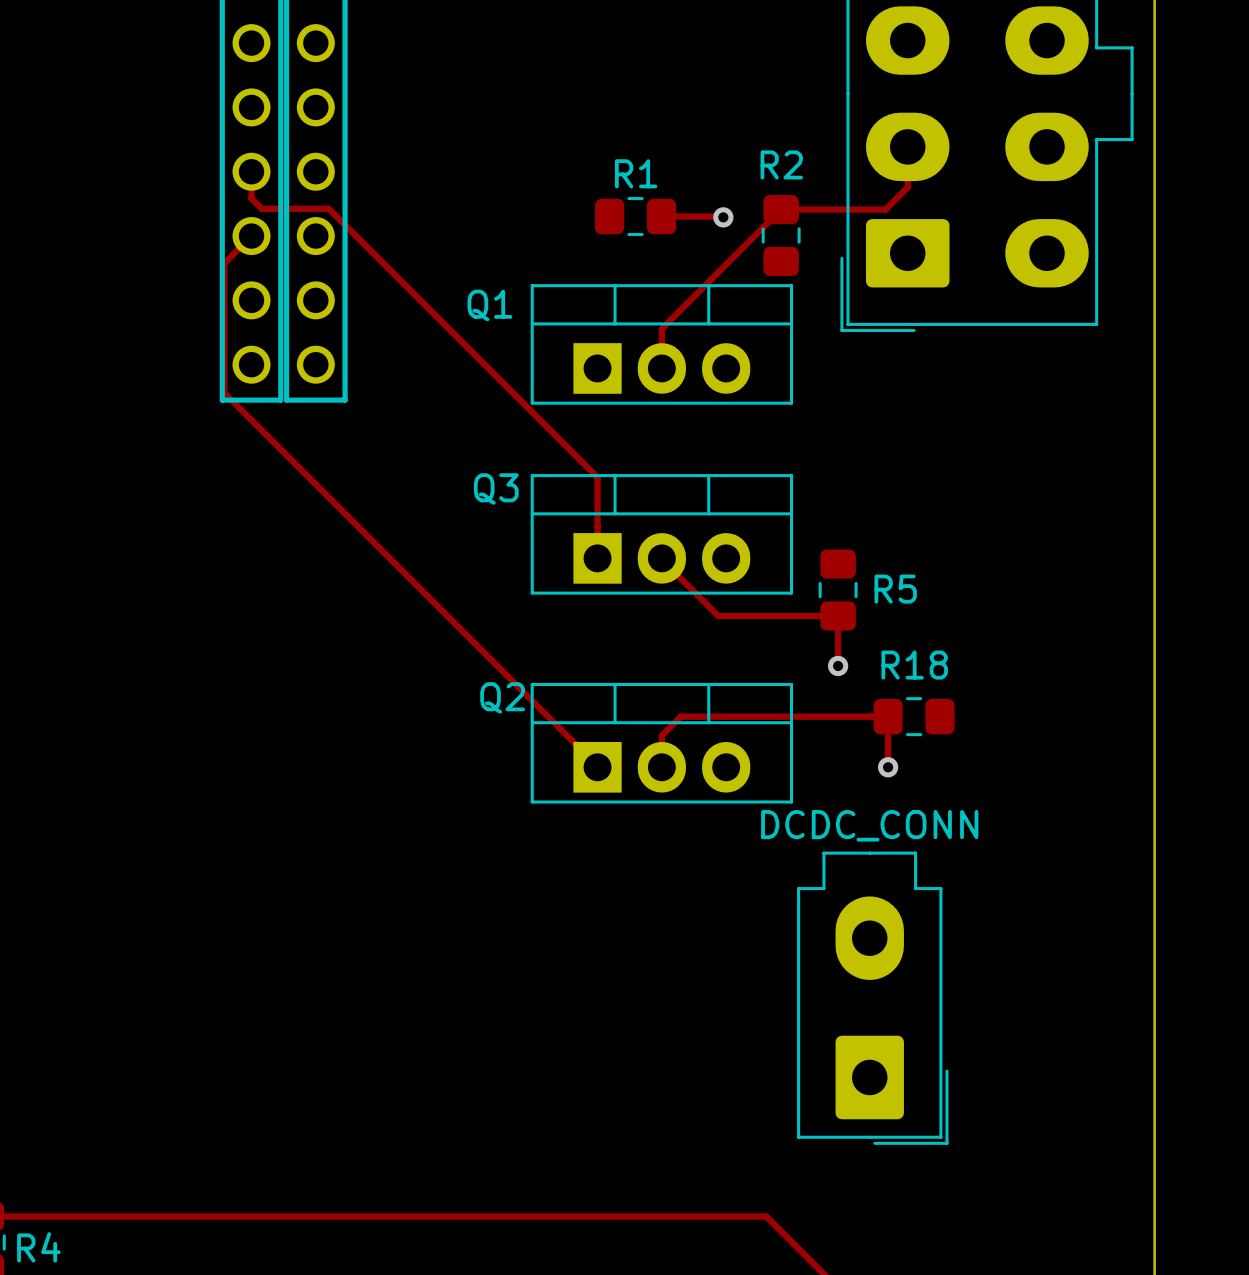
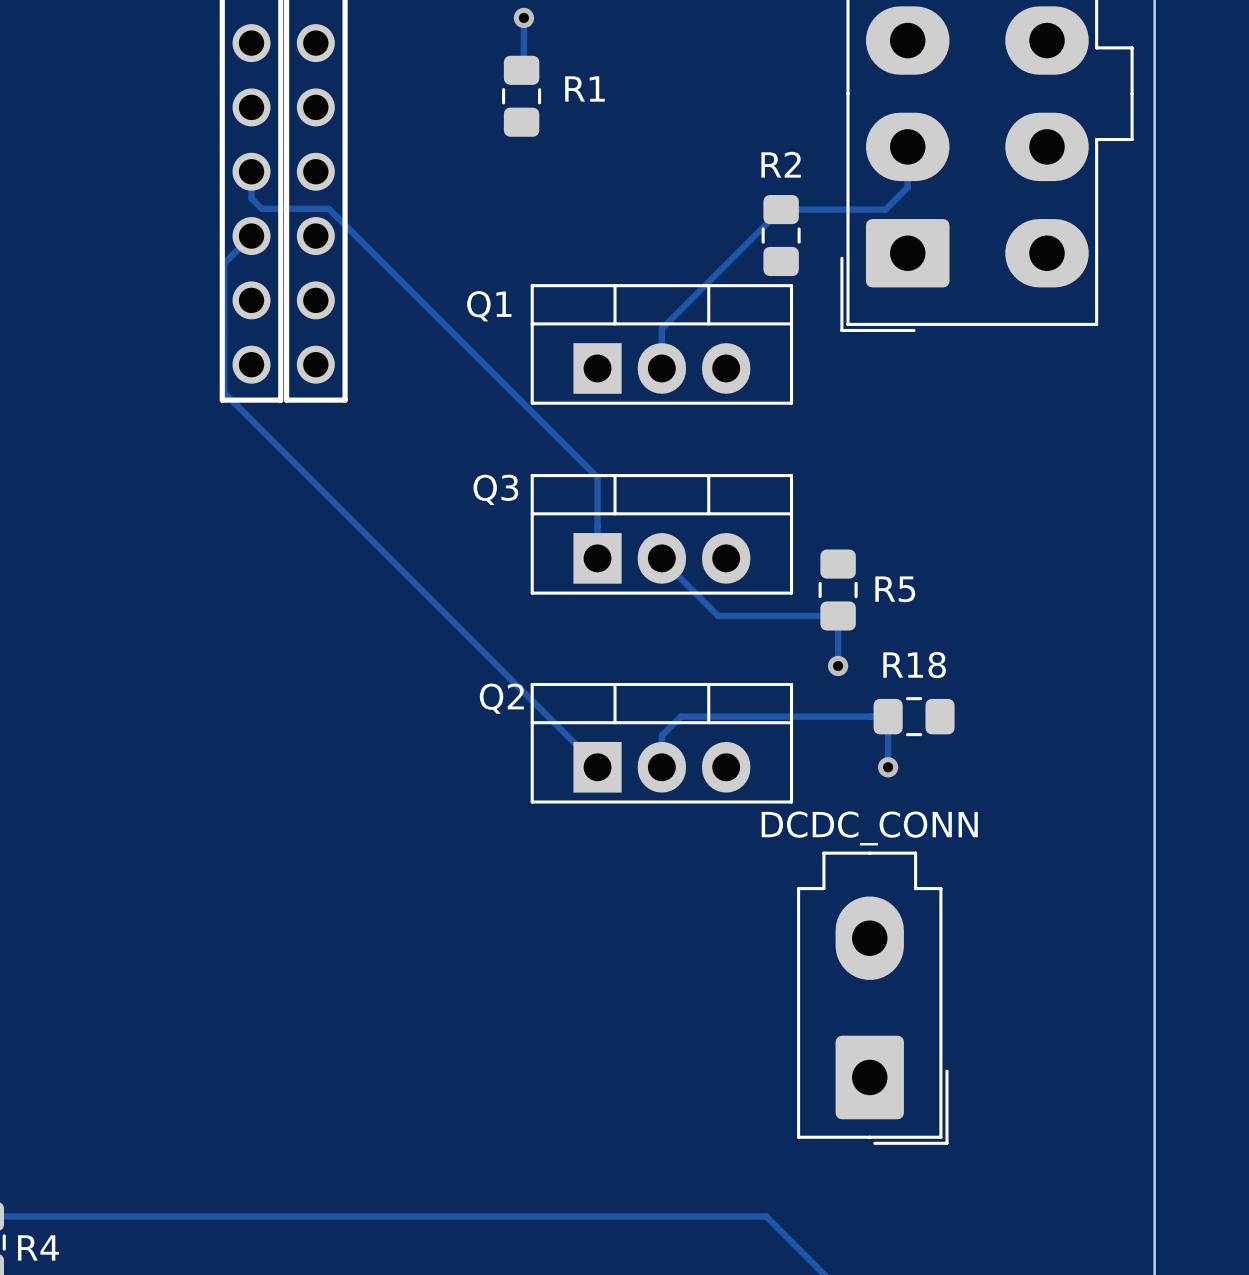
track: none -> (523, 17) (523, 67) (521, 70)
via: none -> (523, 17)
R1 rotation: 0° (635, 216) -> 90° clockwise (521, 96)
R1 position: (635, 216) -> (521, 96)
track: (661, 216) (723, 217) -> none
via: (723, 217) -> none

